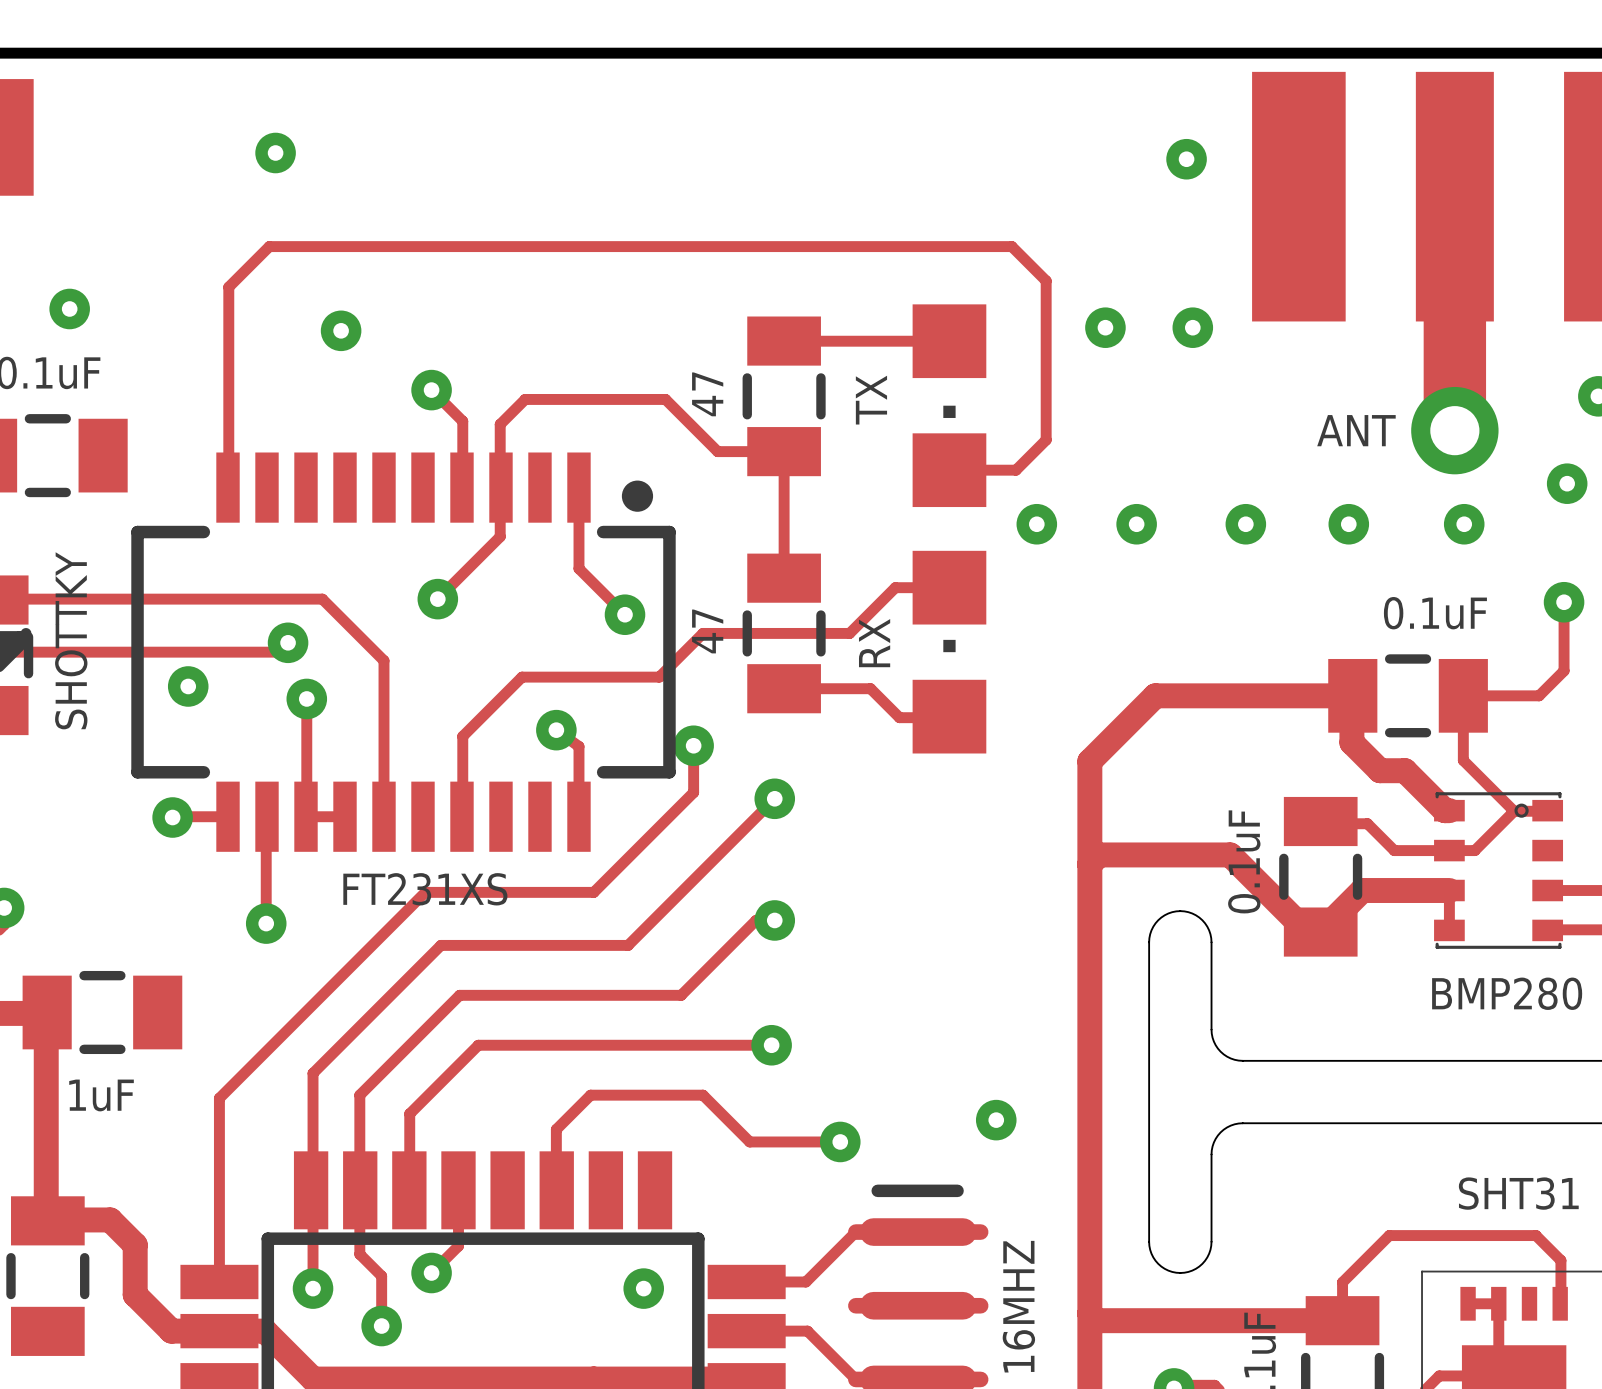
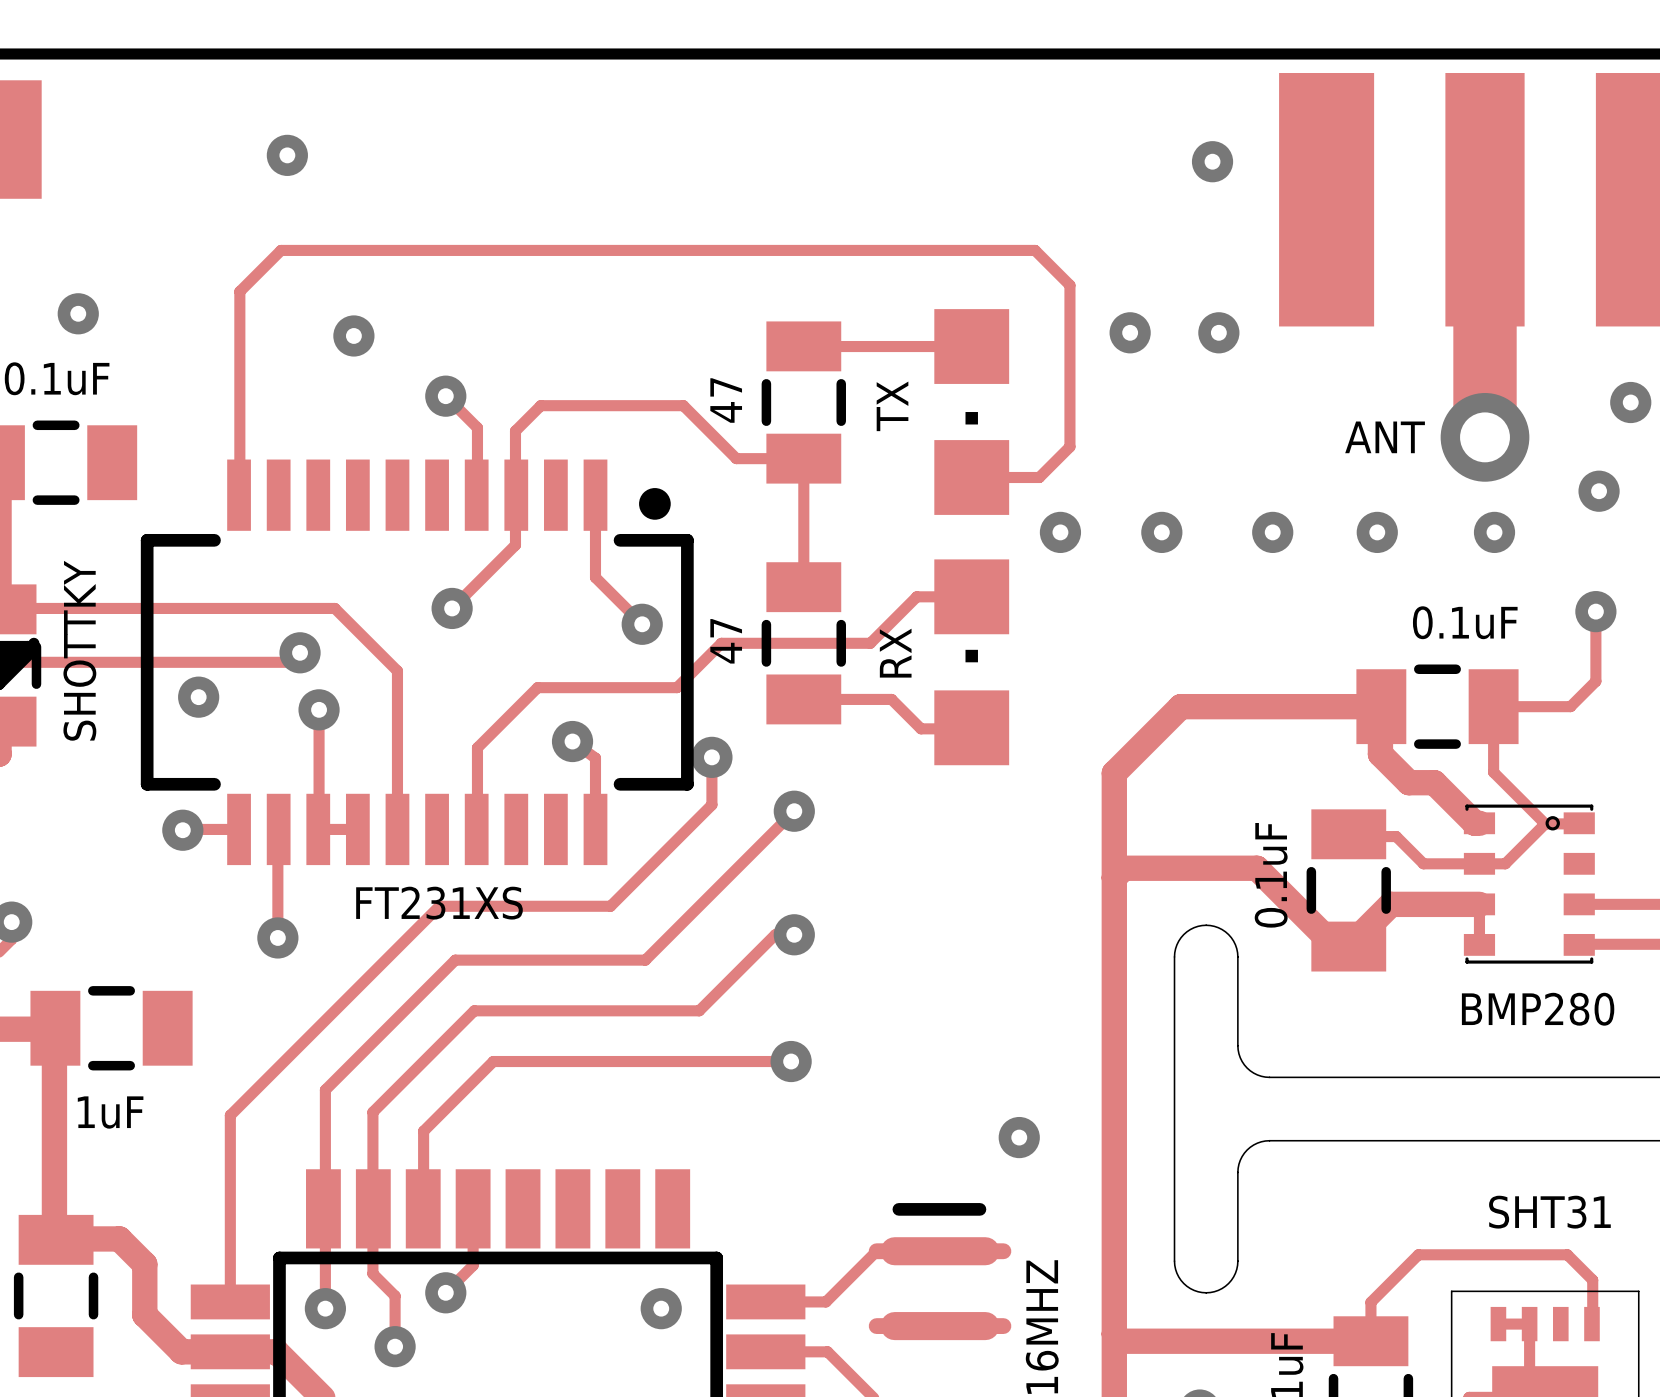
track: (840, 1141) (749, 1141) (702, 1095) (590, 1095) (556, 1129) (556, 1189) -> none
via: (840, 1141) -> none

